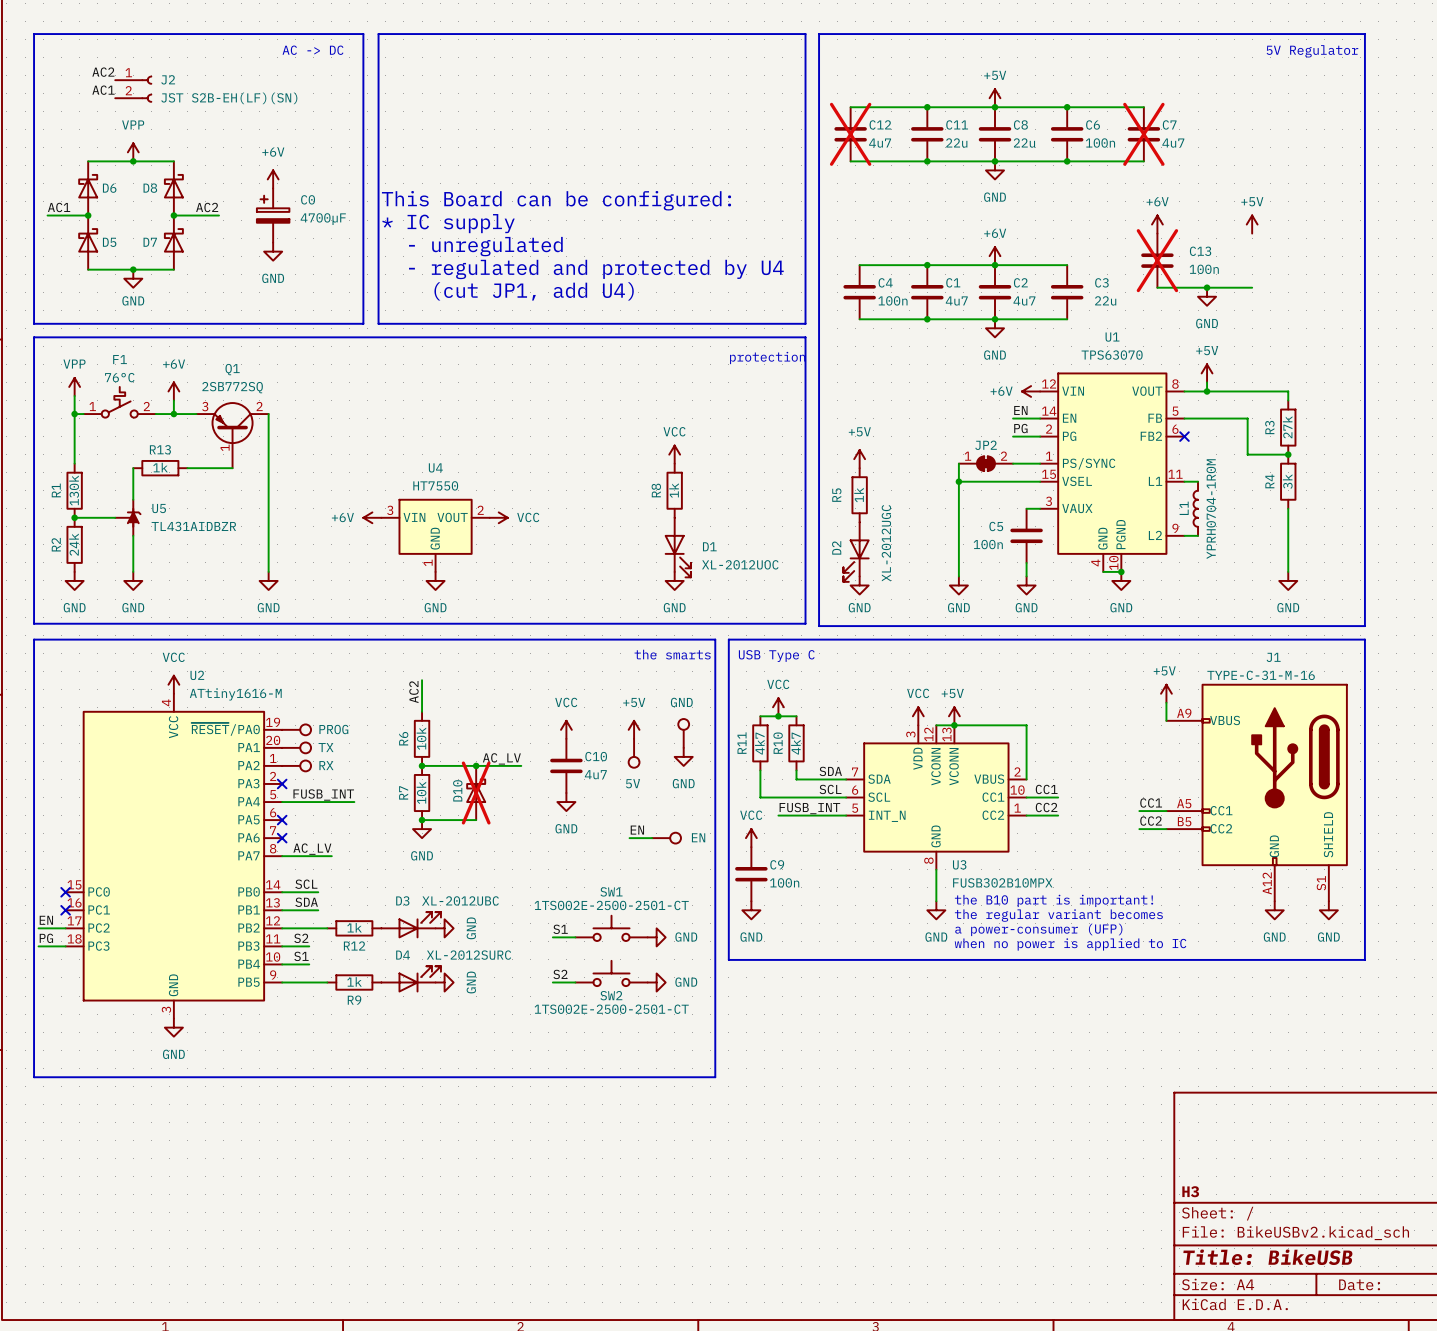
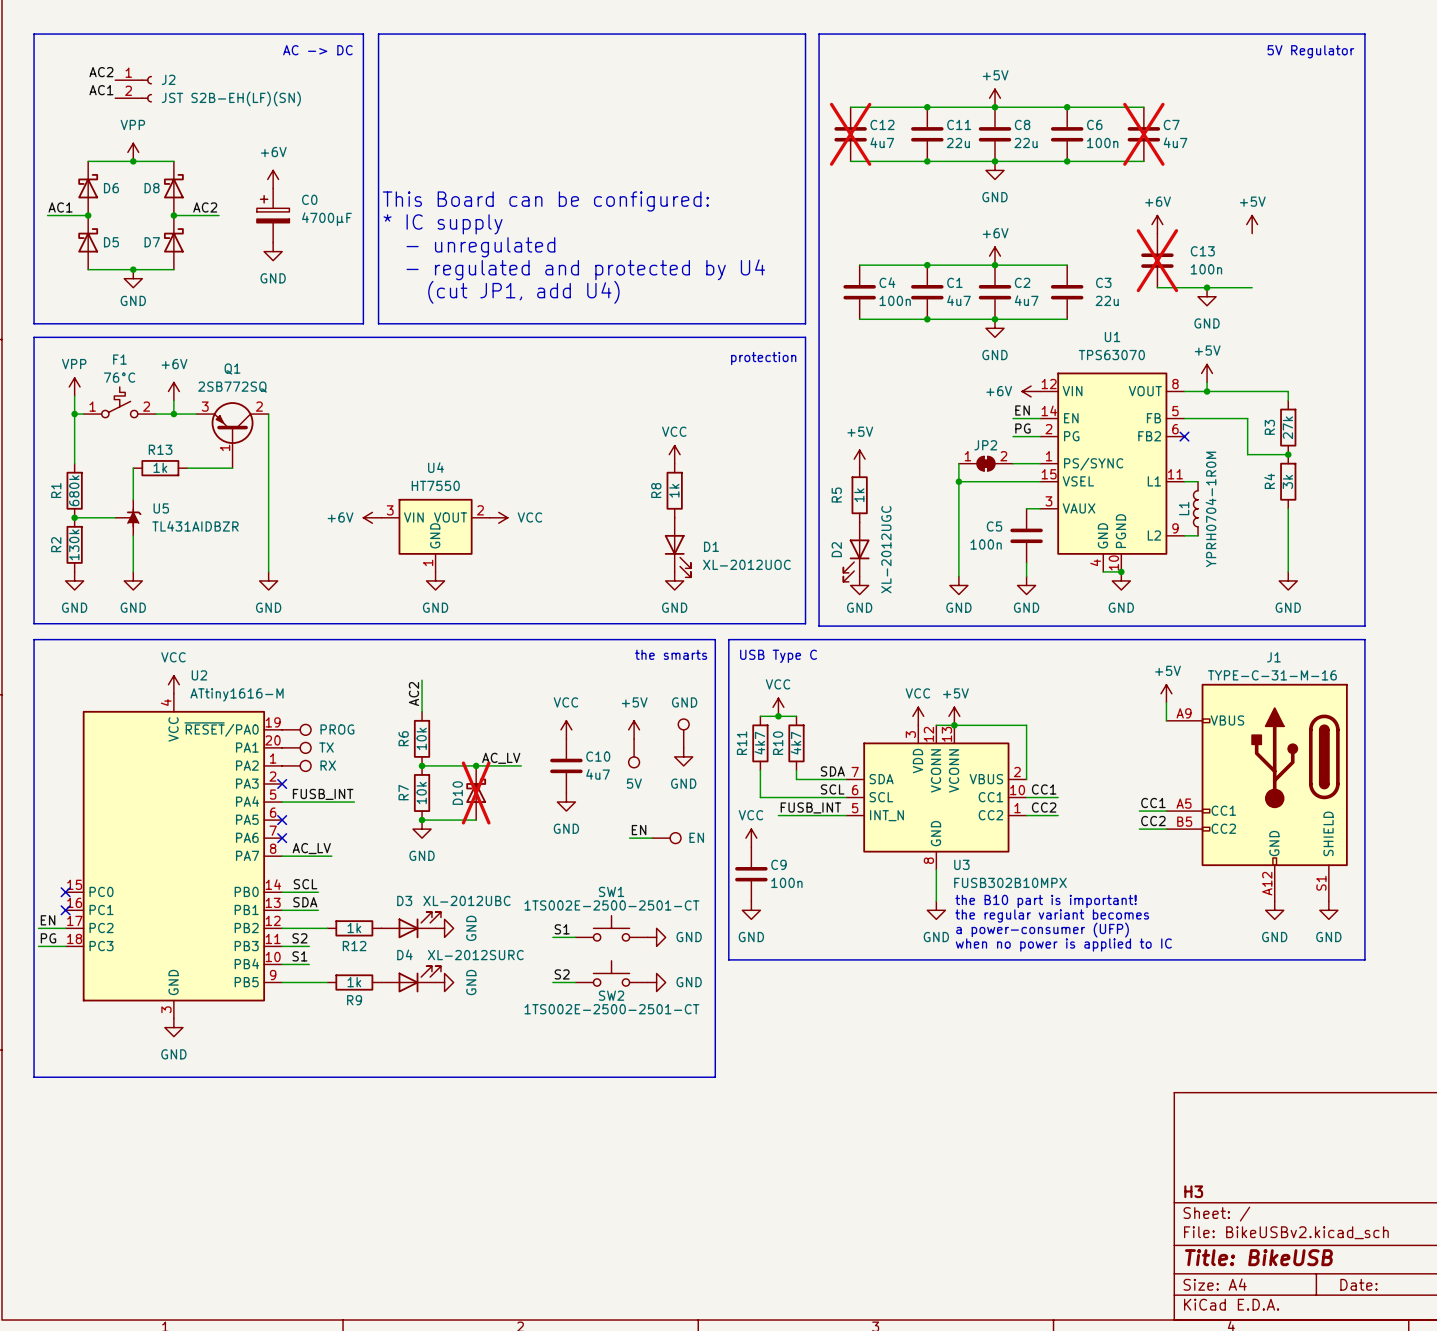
R1 value: 130k (74, 490) -> 680k (74, 490)
R2 value: 24k (74, 544) -> 130k (74, 544)

